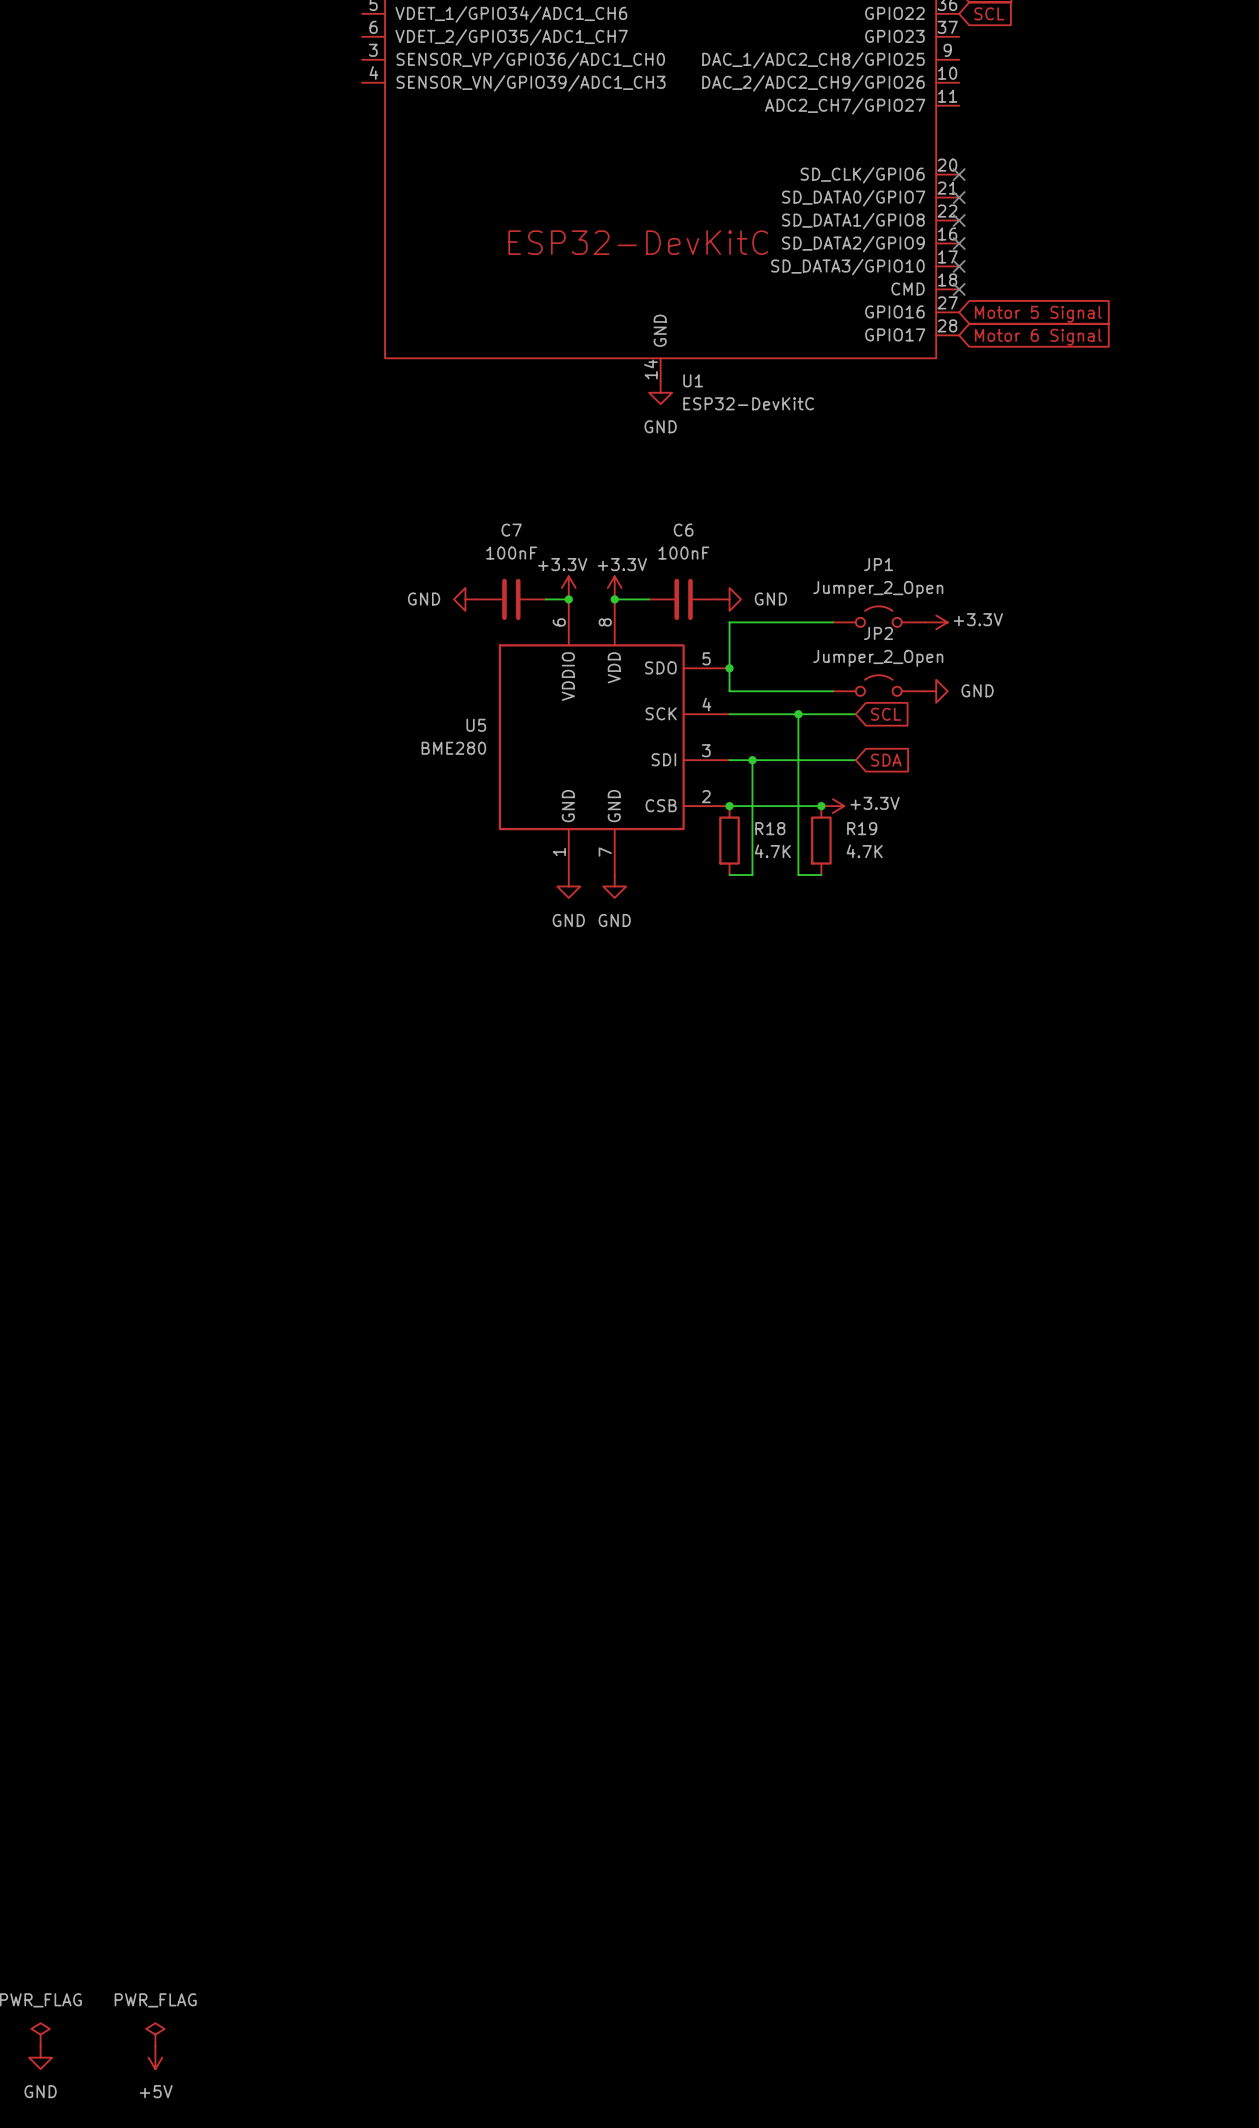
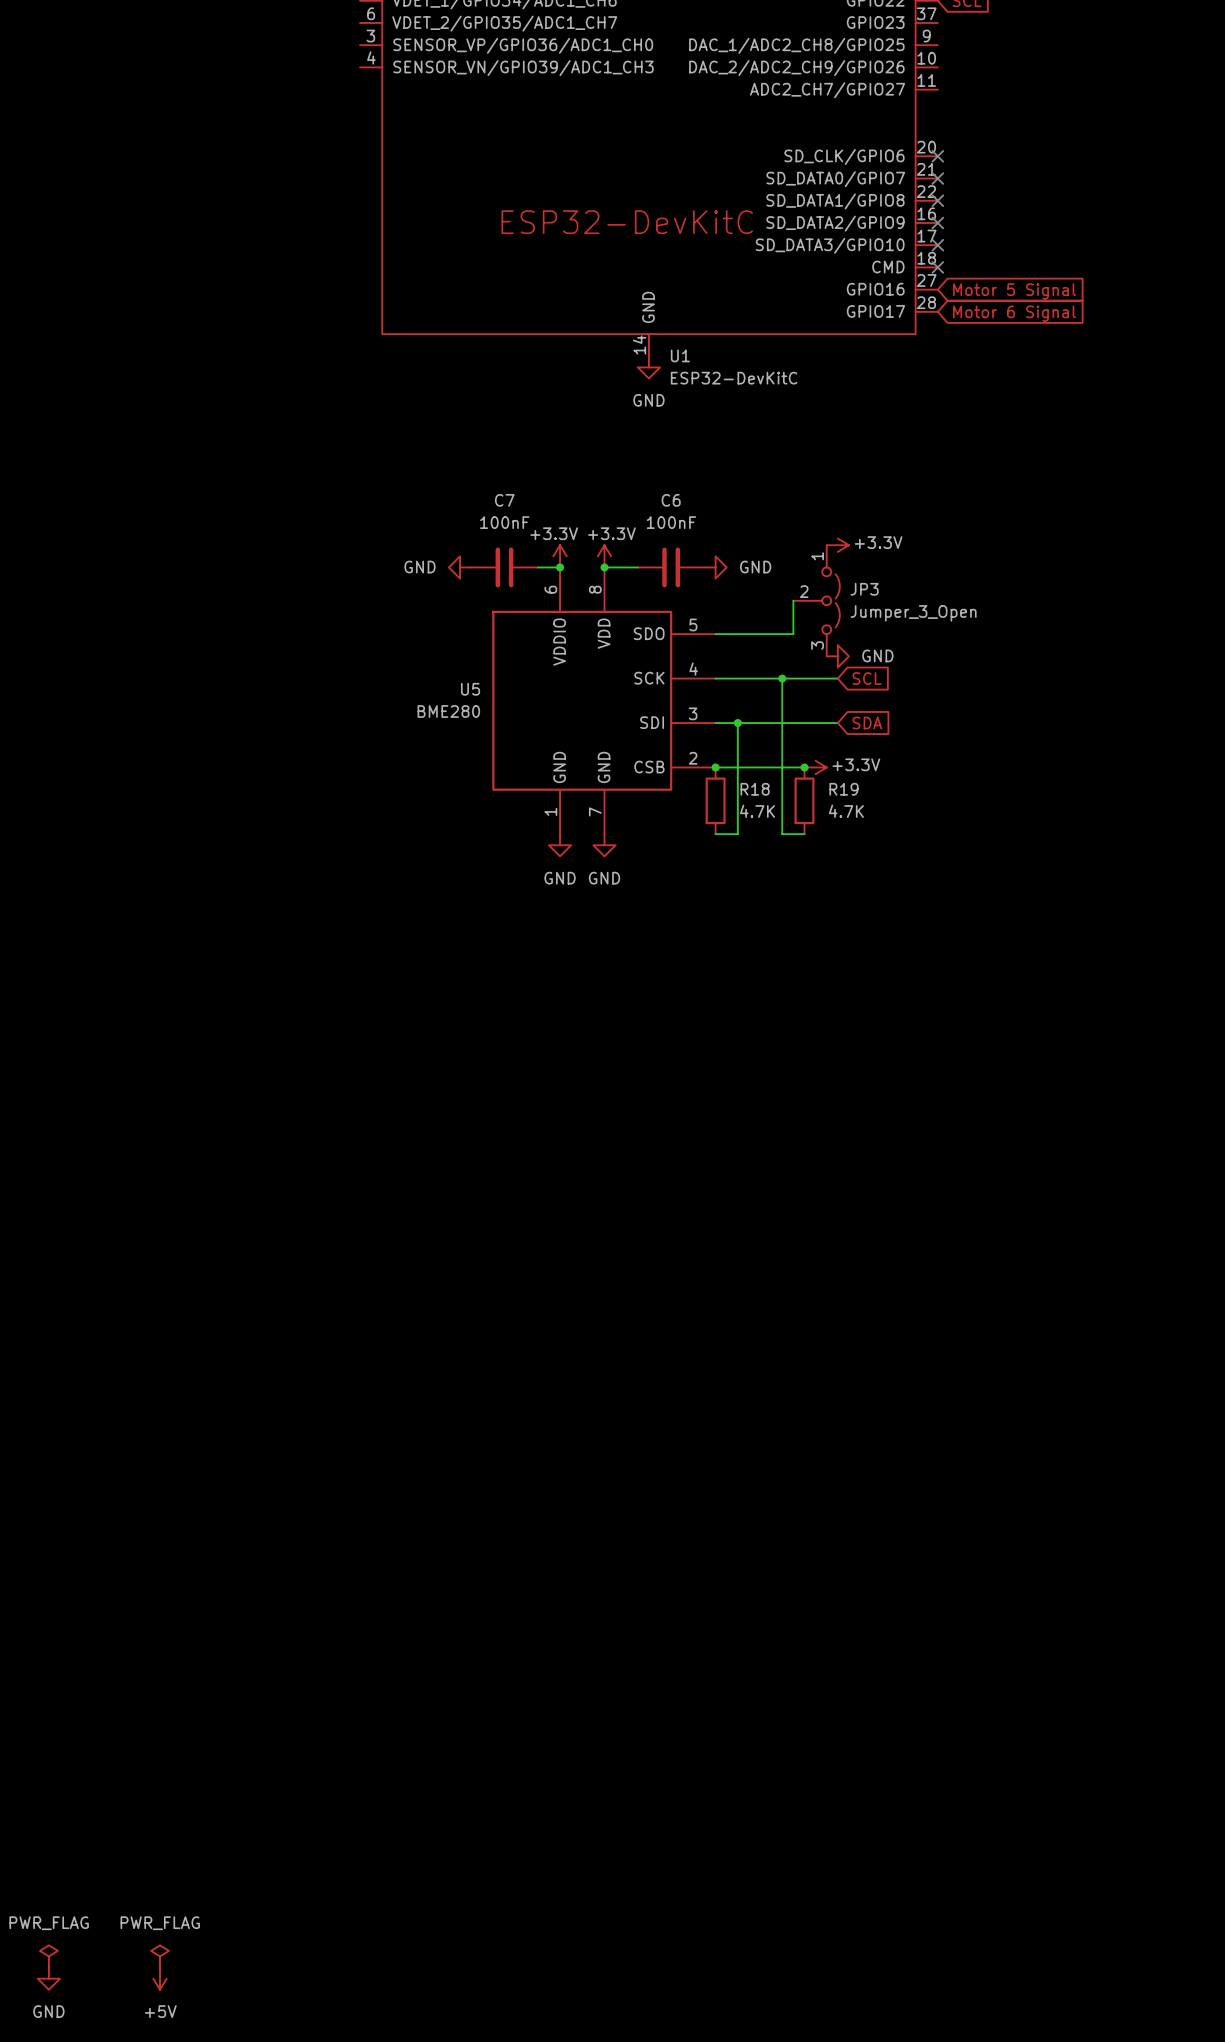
JP1: Jumper_2_Open (878, 616) -> none
wire: (832, 622) (729, 622) (729, 691) (832, 691) -> none
power symbol position: +3.3V (936, 622) -> +3.3V (837, 545)
wire: none -> (793, 600) (793, 634) (715, 634)
JP3: none -> Jumper_3_Open (816, 600)
junction: (729, 668) -> none
JP2: Jumper_2_Open (878, 685) -> none
power symbol position: GND (936, 691) -> GND (837, 656)

